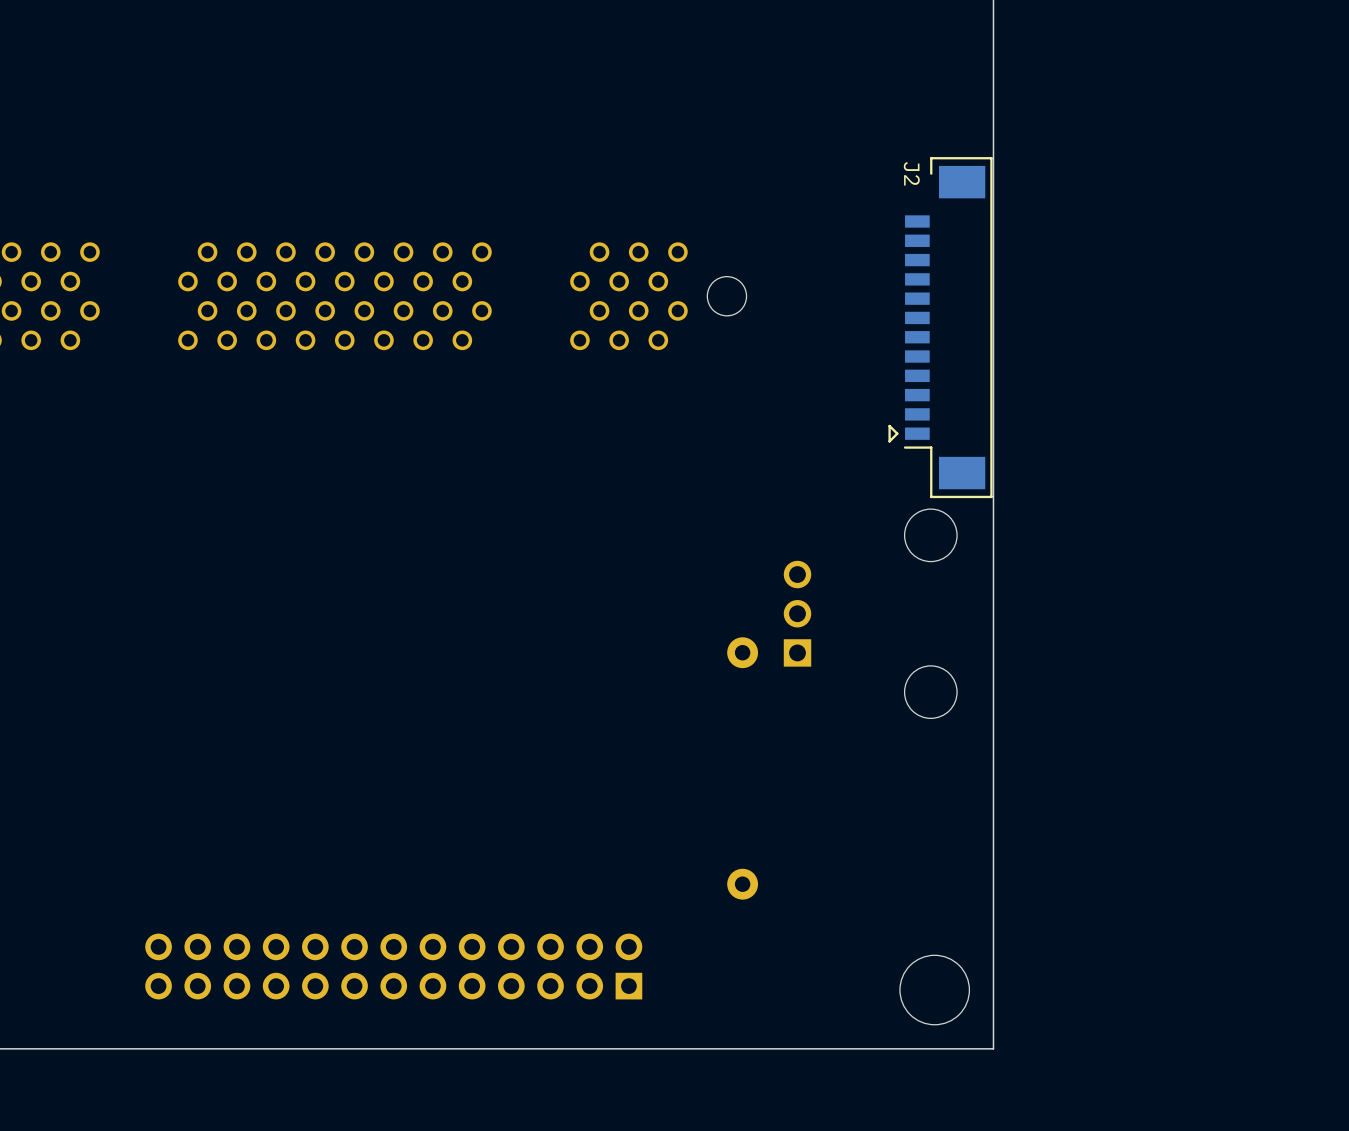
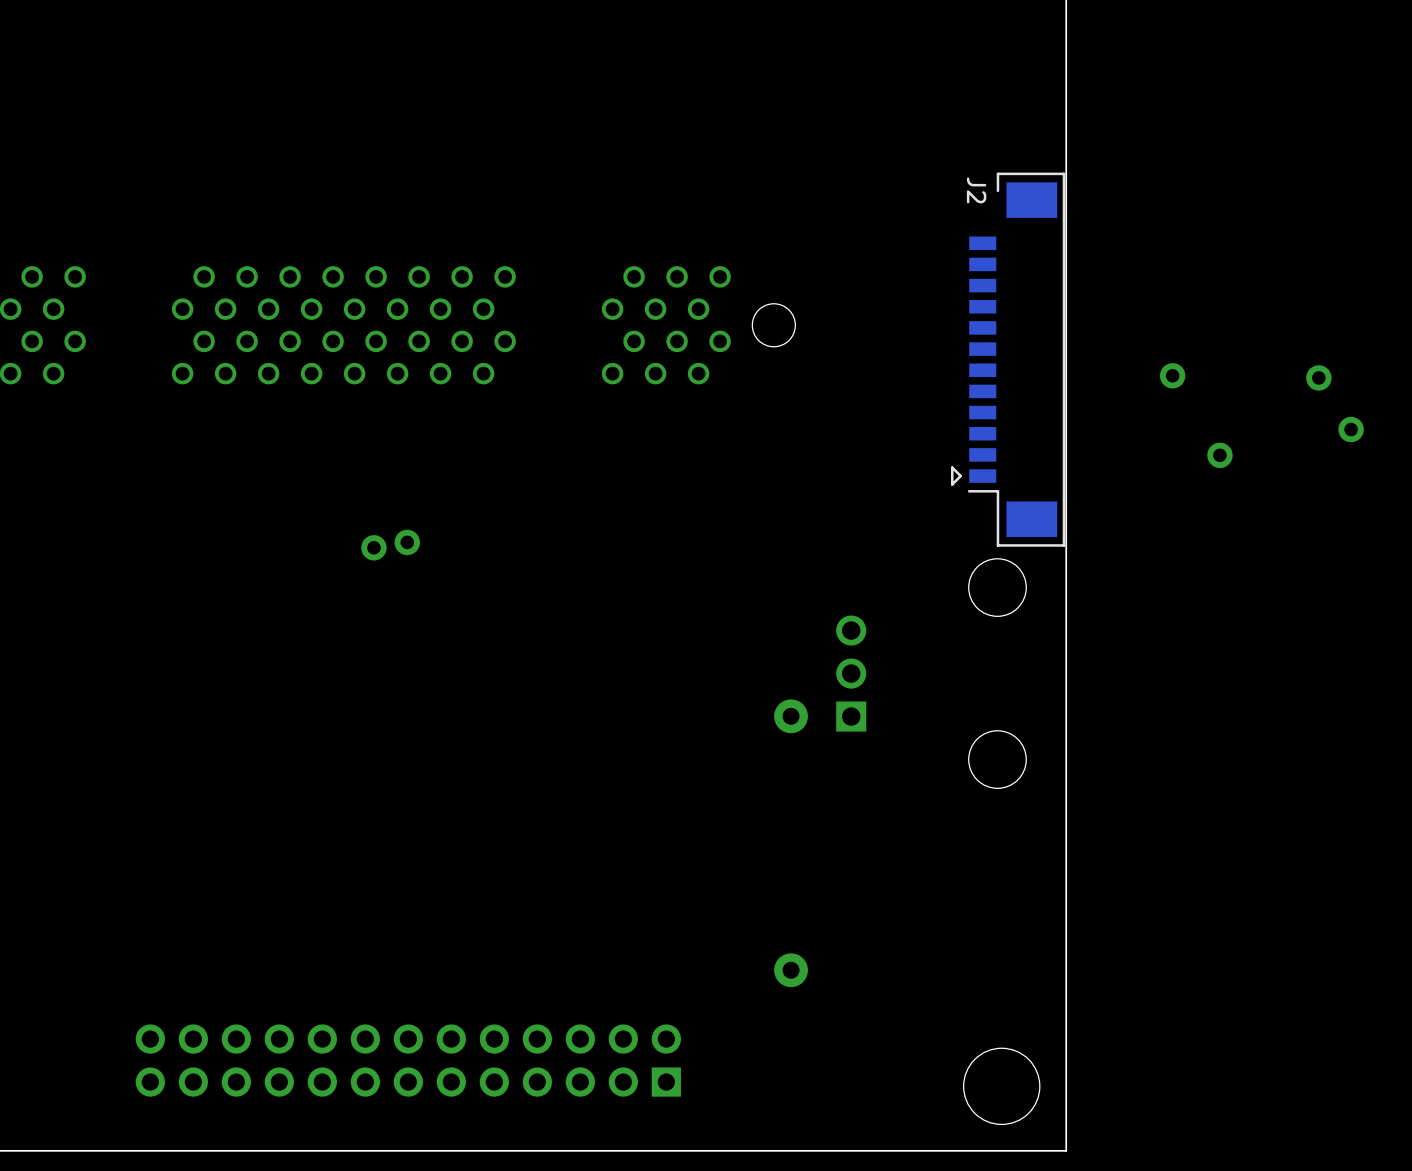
part: none -> (1172, 375)
part: none -> (1318, 377)
part: none -> (1351, 429)
part: none -> (1219, 455)
part: none -> (407, 542)
part: none -> (373, 547)

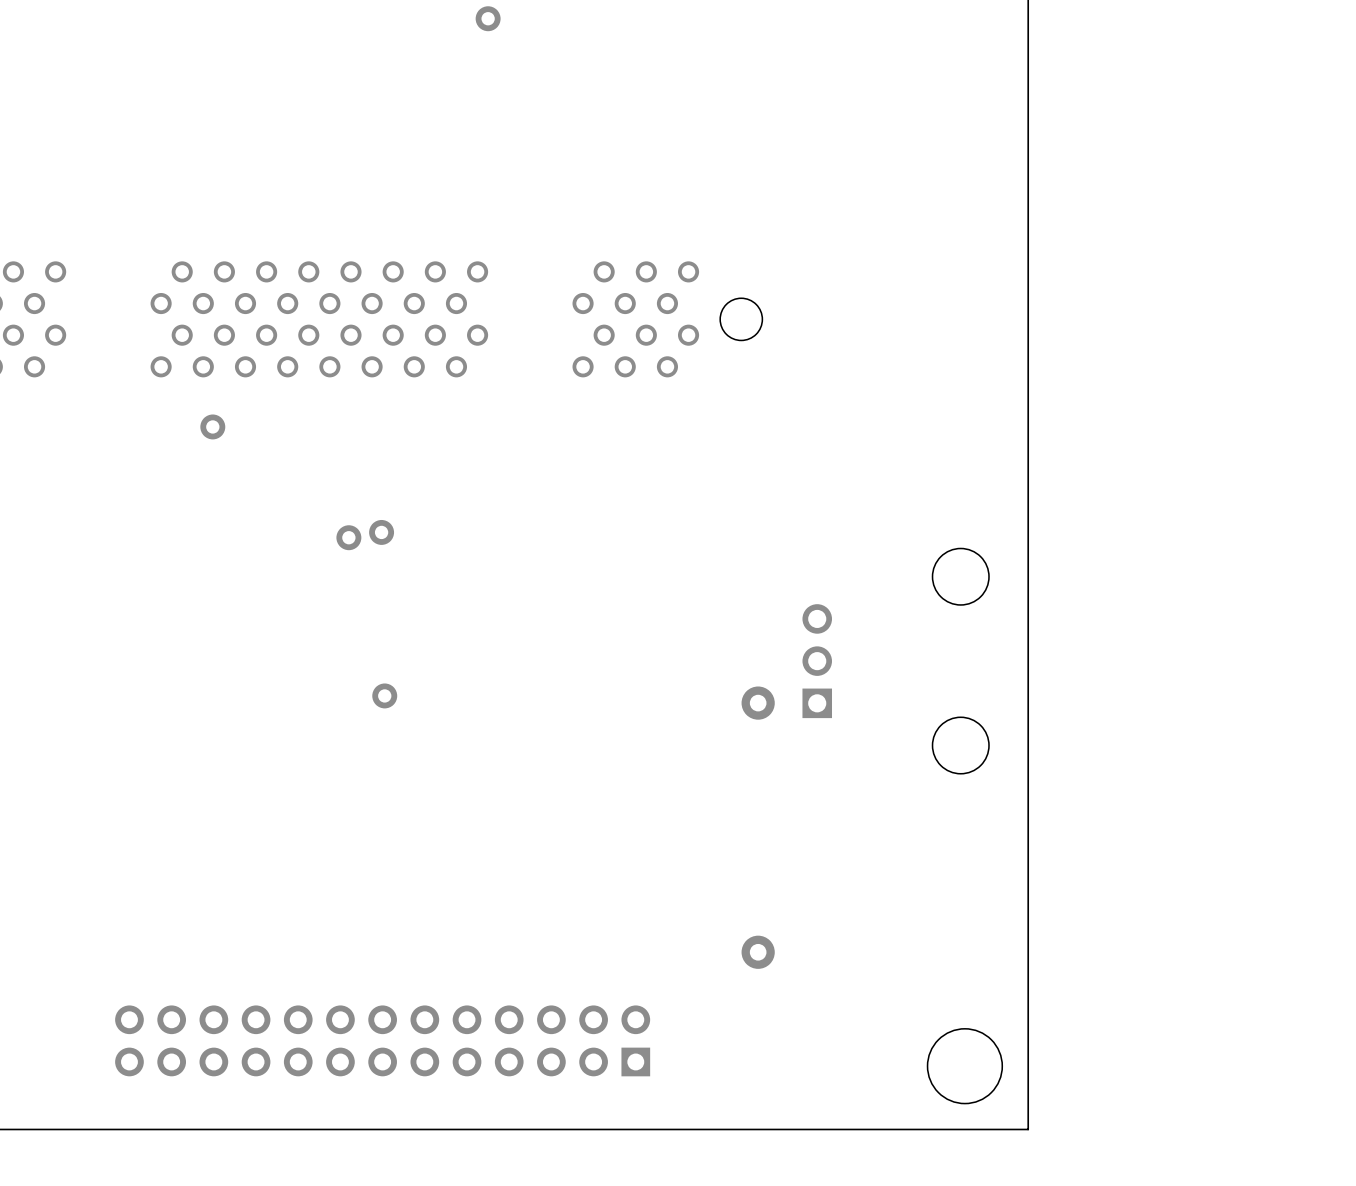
part: none -> (488, 18)
J2: (1008, 359) -> none
part: (1172, 375) -> none
part: (1318, 377) -> none
part: (1351, 429) -> none
part: none -> (212, 426)
part: (1219, 455) -> none
part: none -> (384, 695)

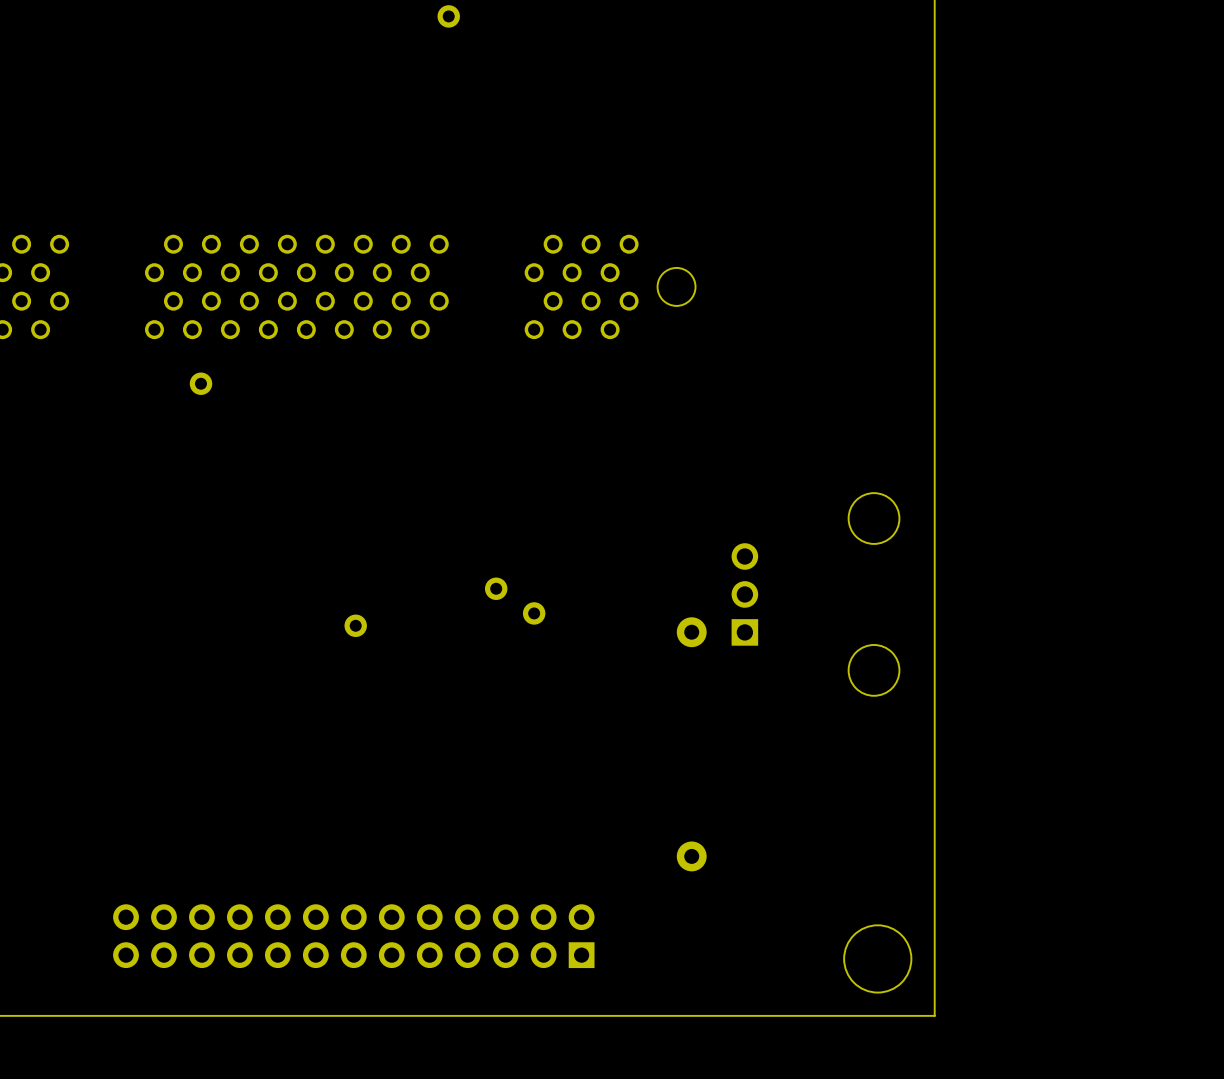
part: (381, 532) -> none
part: (348, 537) -> none
part: none -> (496, 588)
part: none -> (534, 613)

